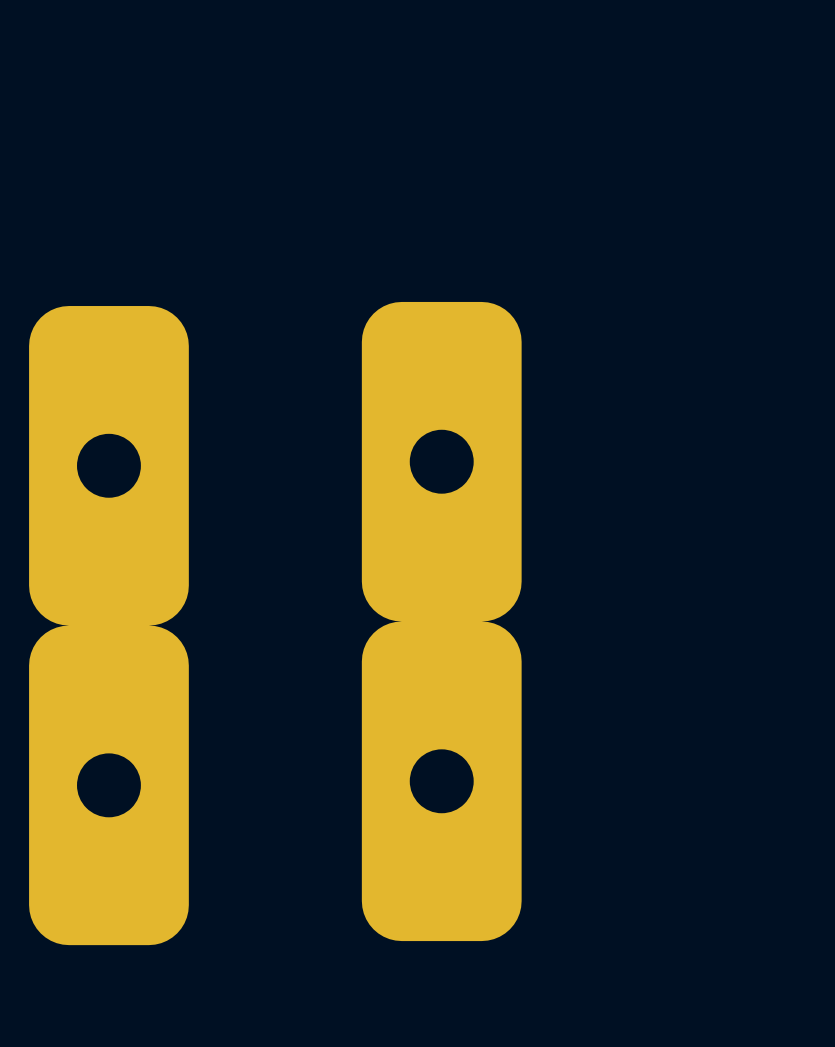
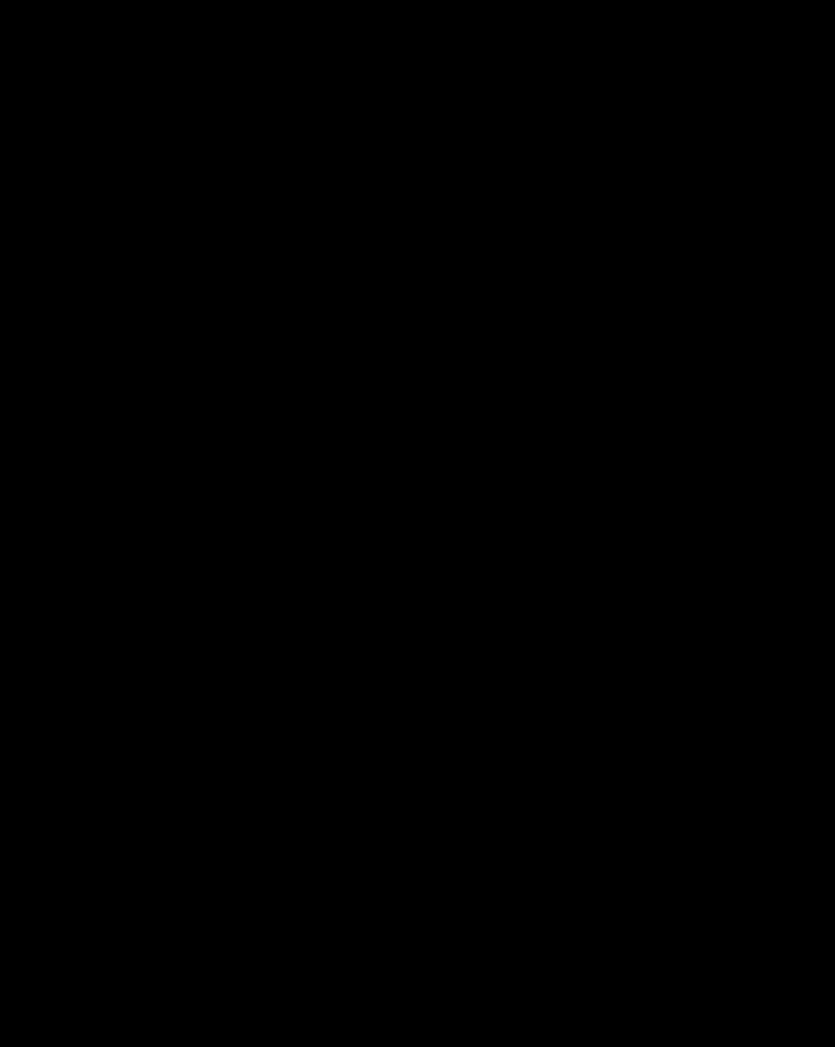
part: (441, 621) -> none
part: (108, 625) -> none

